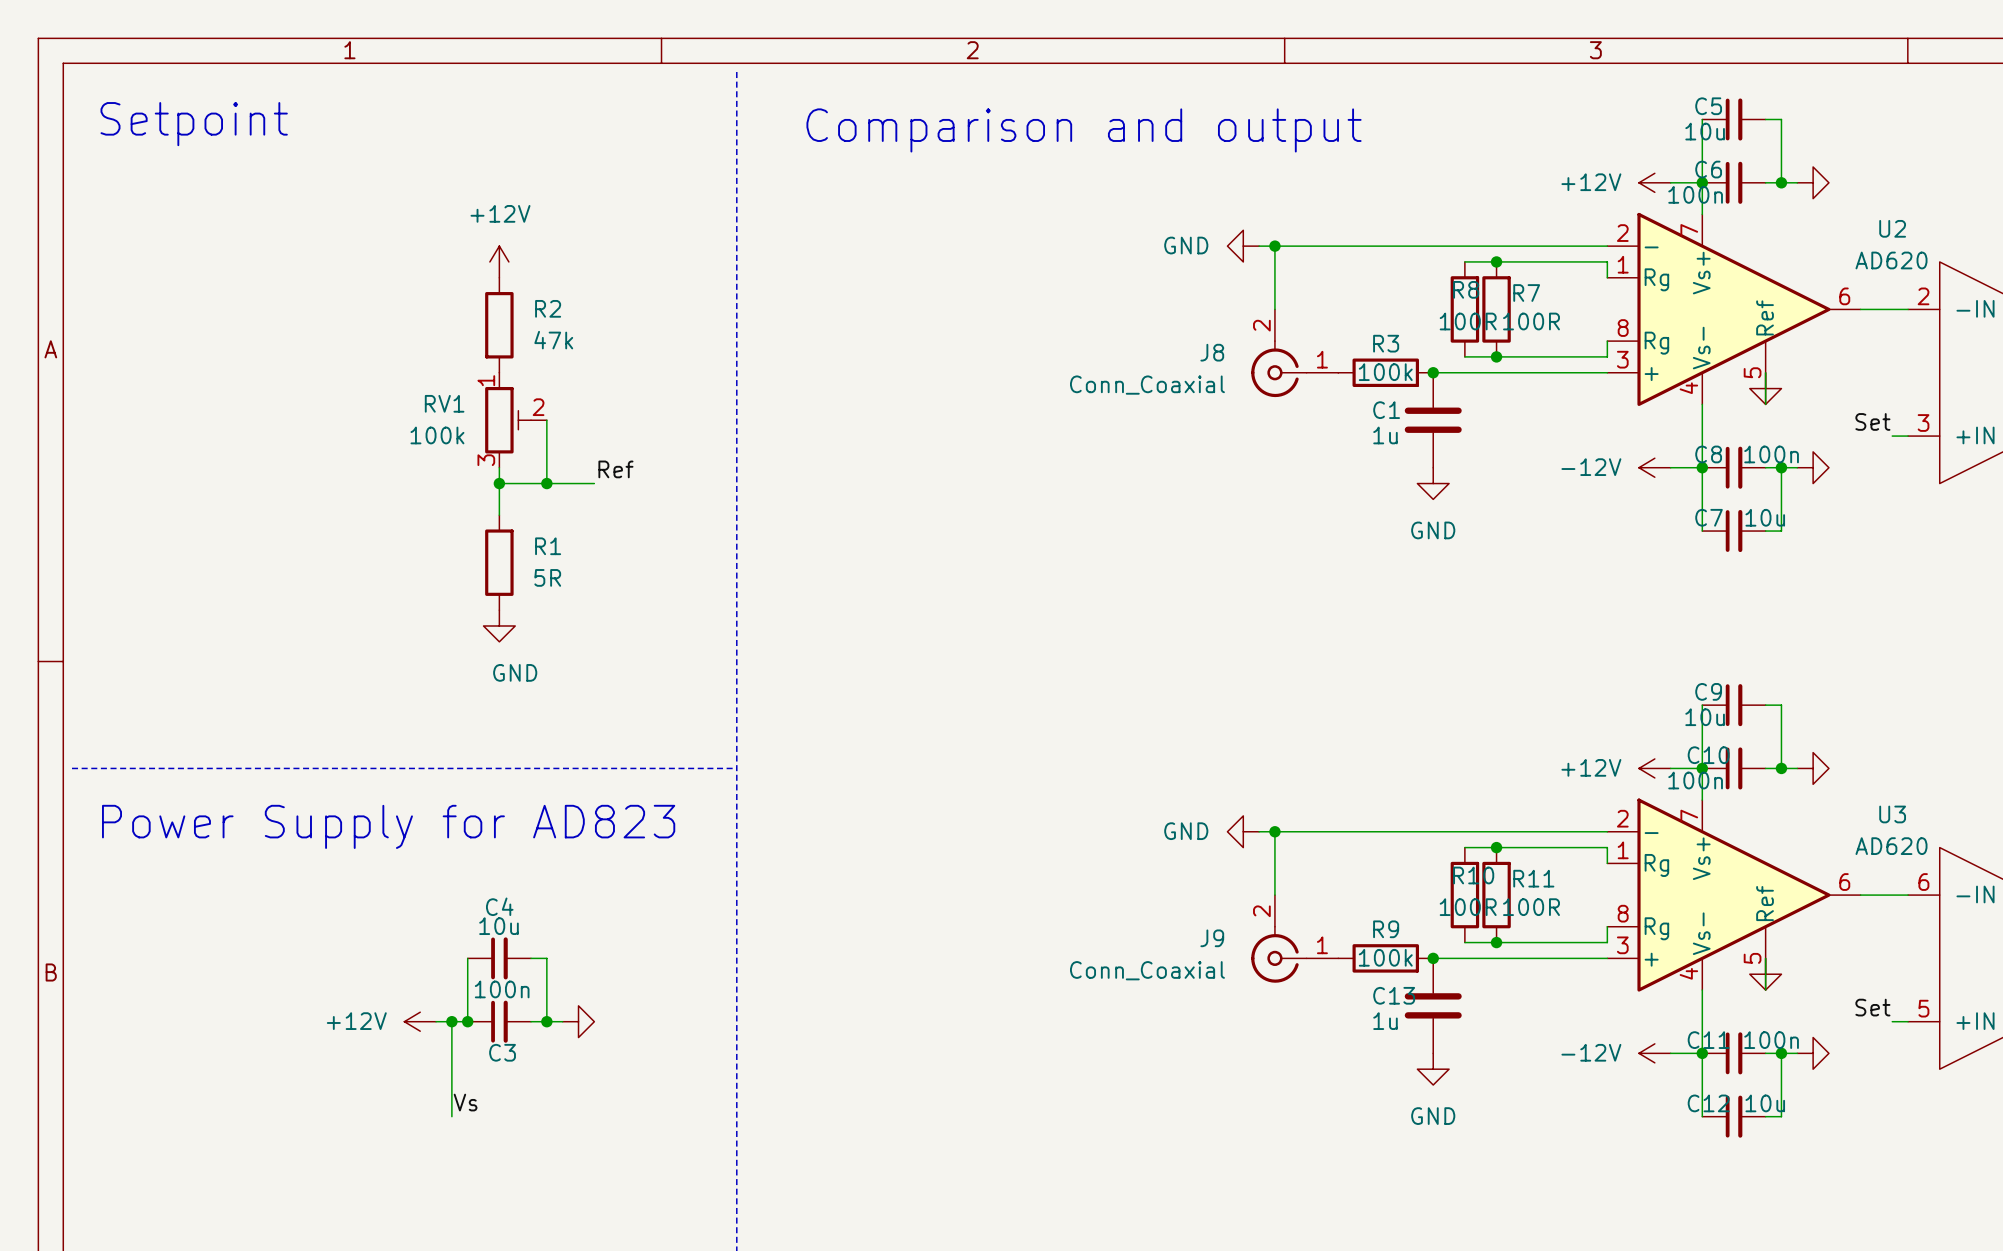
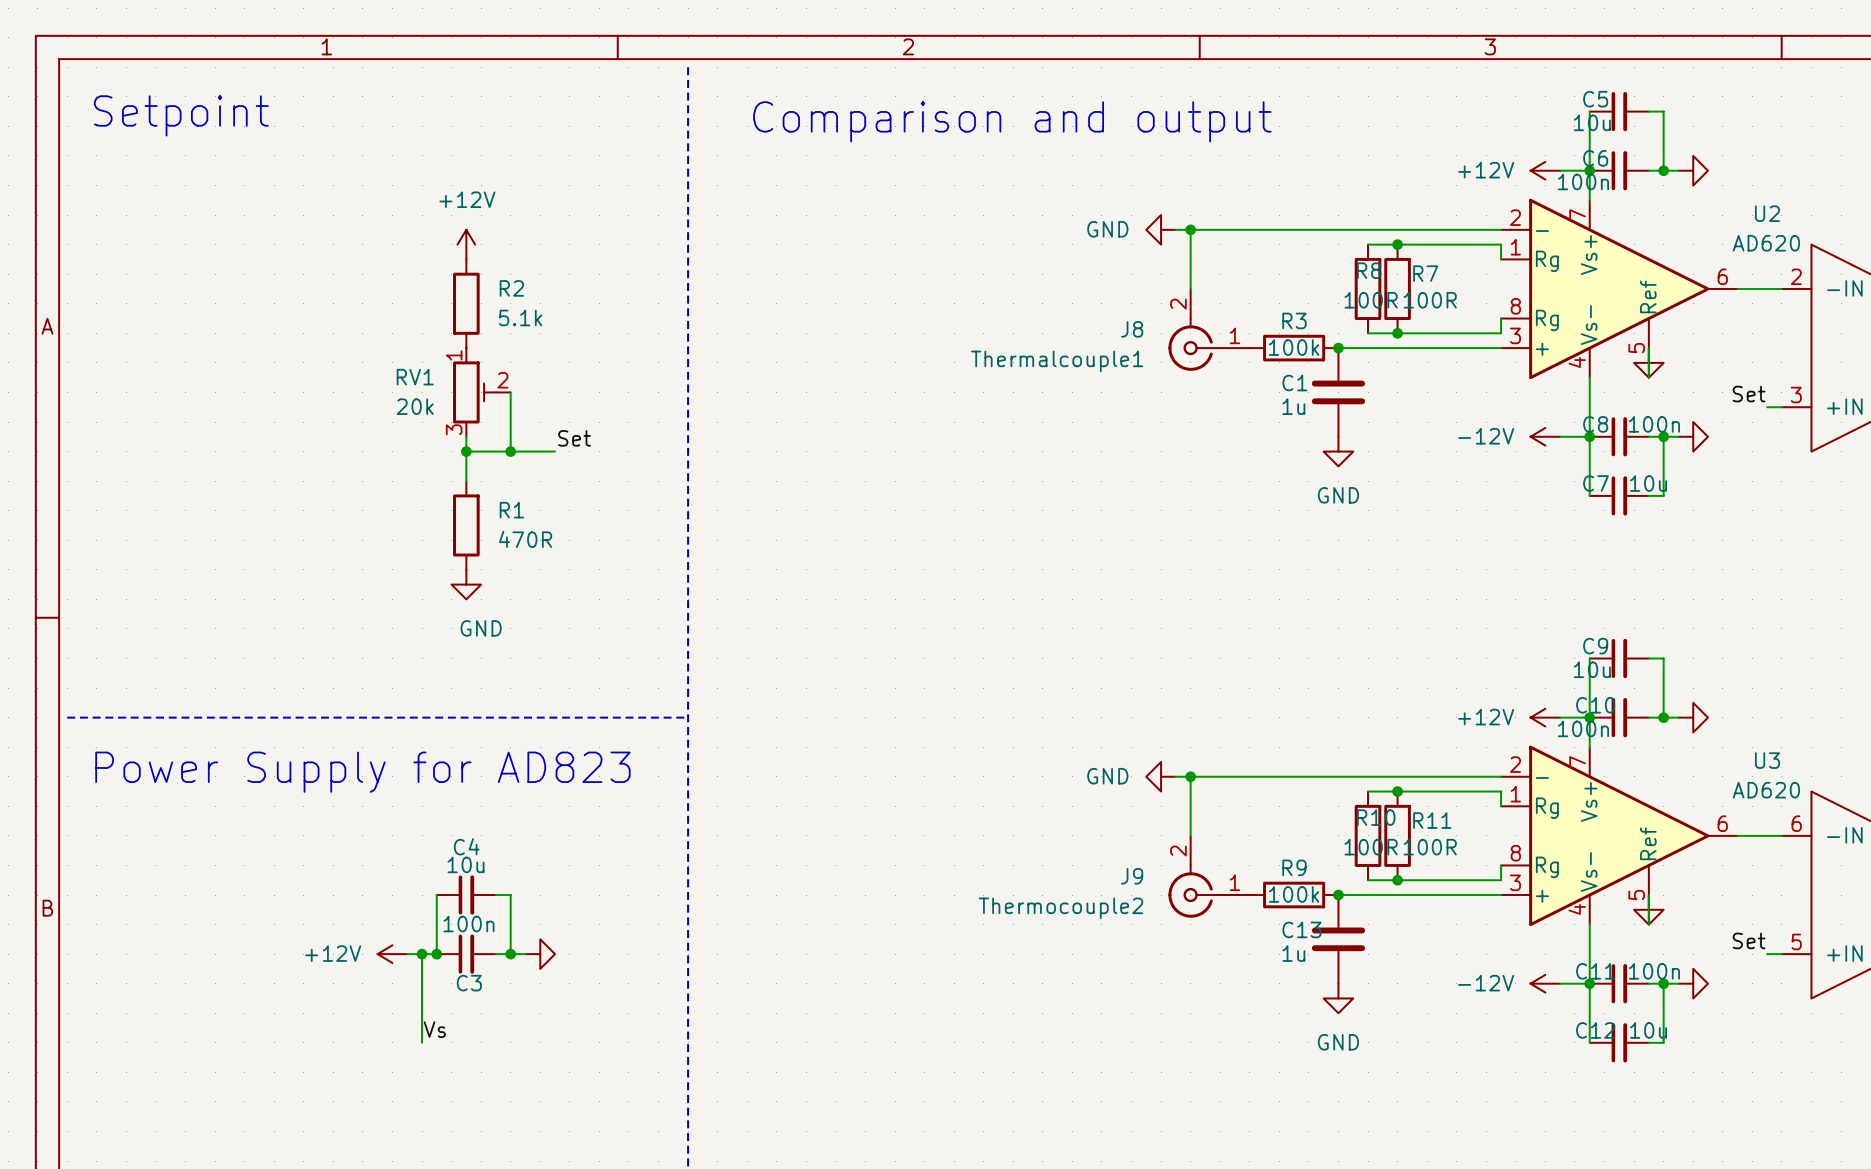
R2 value: 47k (553, 340) -> 5.1k (520, 317)
J8 value: Conn_Coaxial (1147, 385) -> Thermalcouple1 (1057, 361)
RV1 value: 100k (437, 435) -> 20k (415, 406)
label: Ref (615, 469) -> Set (574, 438)
R1 value: 5R (547, 577) -> 470R (525, 539)
J9 value: Conn_Coaxial (1147, 970) -> Thermocouple2 (1061, 908)

